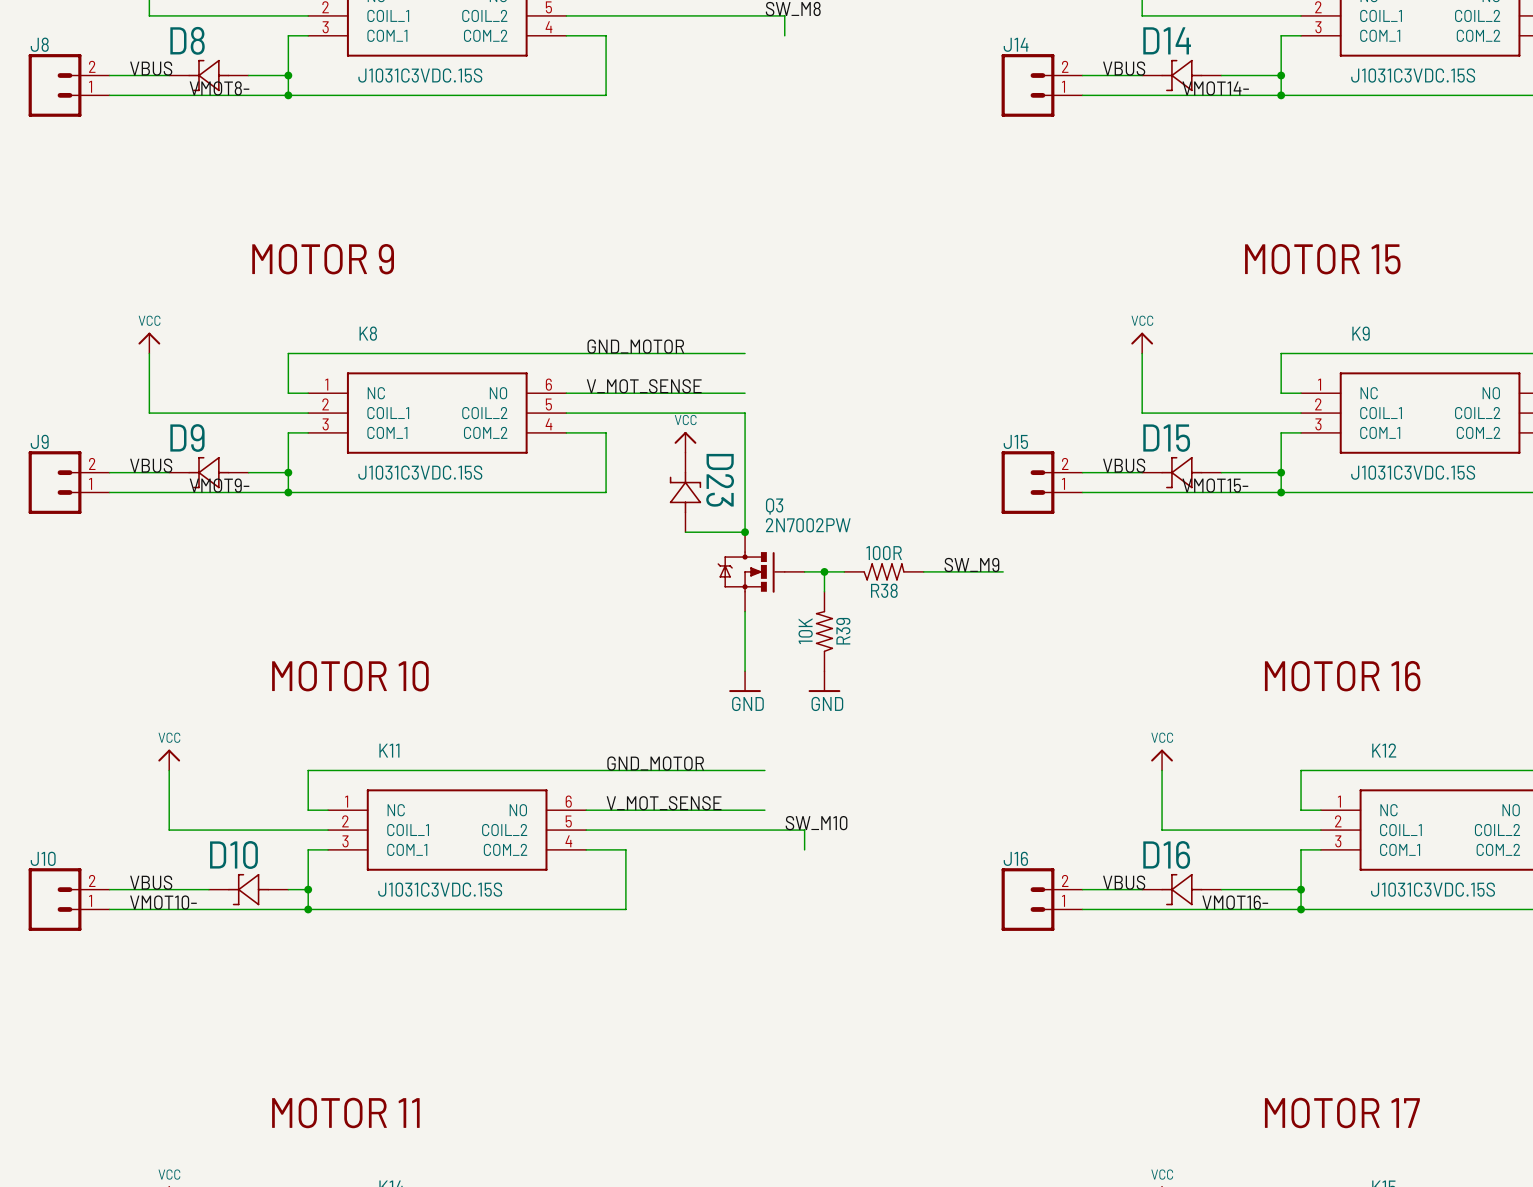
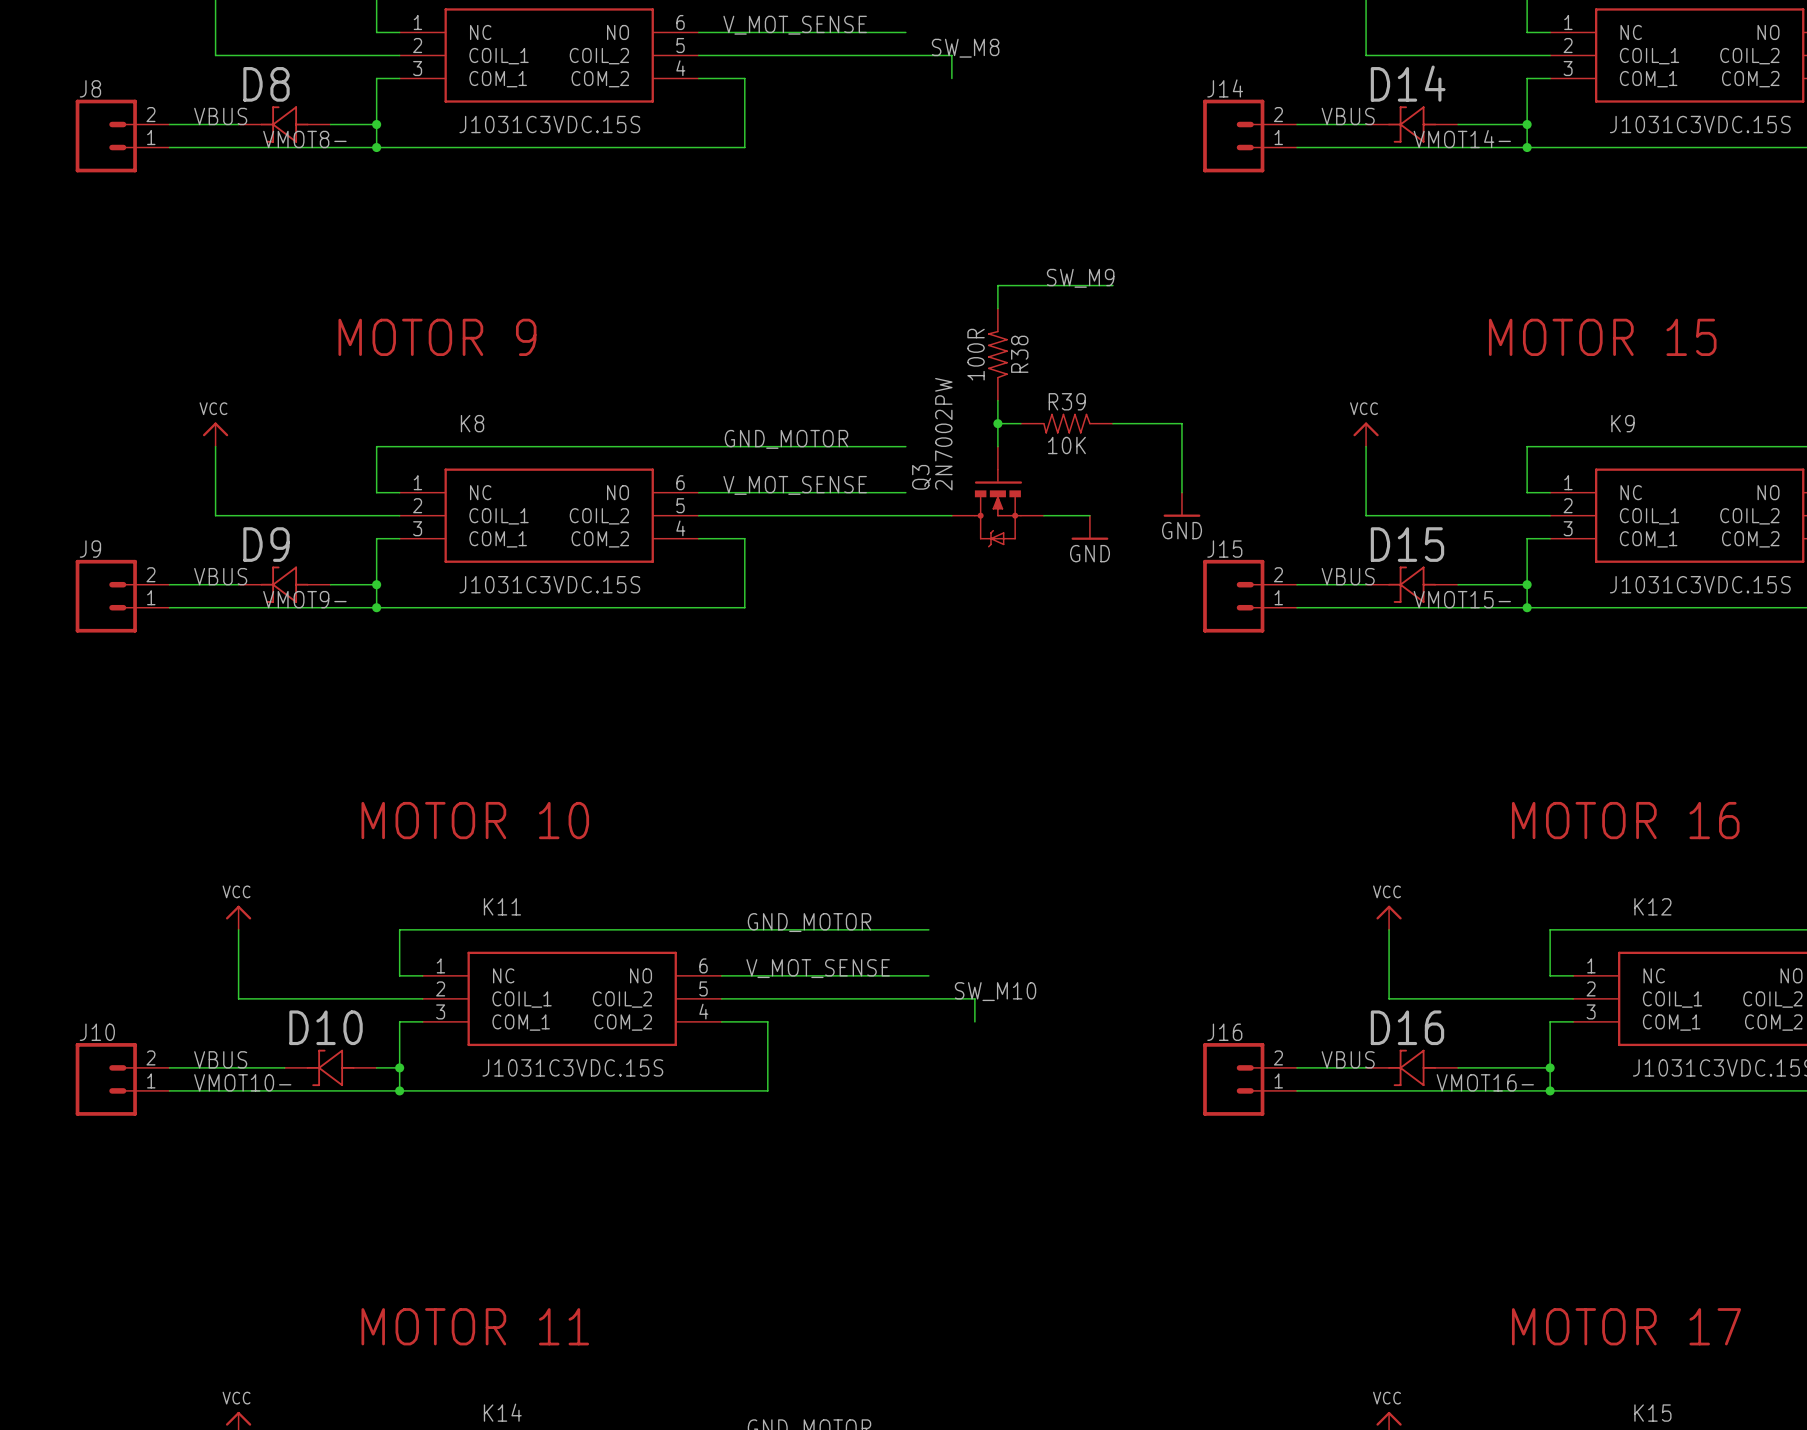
label: none -> SW_M9 (1080, 278)
wire: none -> (1112, 285) (997, 285) (997, 308)
wire: none -> (997, 400) (997, 446)
wire: none -> (997, 423) (1020, 423)
junction: none -> (997, 423)
wire: none -> (1112, 423) (1181, 423) (1181, 492)
power symbol: none -> GND (1181, 504)
wire: (745, 413) (745, 532) (685, 532) -> (905, 515) (951, 515)
power symbol: none -> GND (1089, 527)
power symbol: VCC (685, 442) -> none
D23: (685, 492) -> none
junction: (745, 532) -> none
label: SW_M9 (971, 564) -> none
Q3 position: (761, 571) -> (997, 497)
wire: (804, 571) (844, 571) -> (1043, 515) (1089, 515)
wire: (824, 571) (824, 591) -> none
junction: (824, 571) -> none
R38 rotation: 0° (884, 571) -> 90° counterclockwise (997, 354)
R38 position: (884, 571) -> (997, 354)
wire: (923, 571) (1003, 571) -> none
Q3 rotation: 0° (751, 572) -> 90° counterclockwise (998, 508)
wire: (745, 611) (745, 671) -> none
R39 rotation: 0° (824, 631) -> 90° counterclockwise (1066, 423)
R39 position: (824, 631) -> (1066, 423)
power symbol: GND (745, 681) -> none
power symbol: GND (824, 681) -> none

